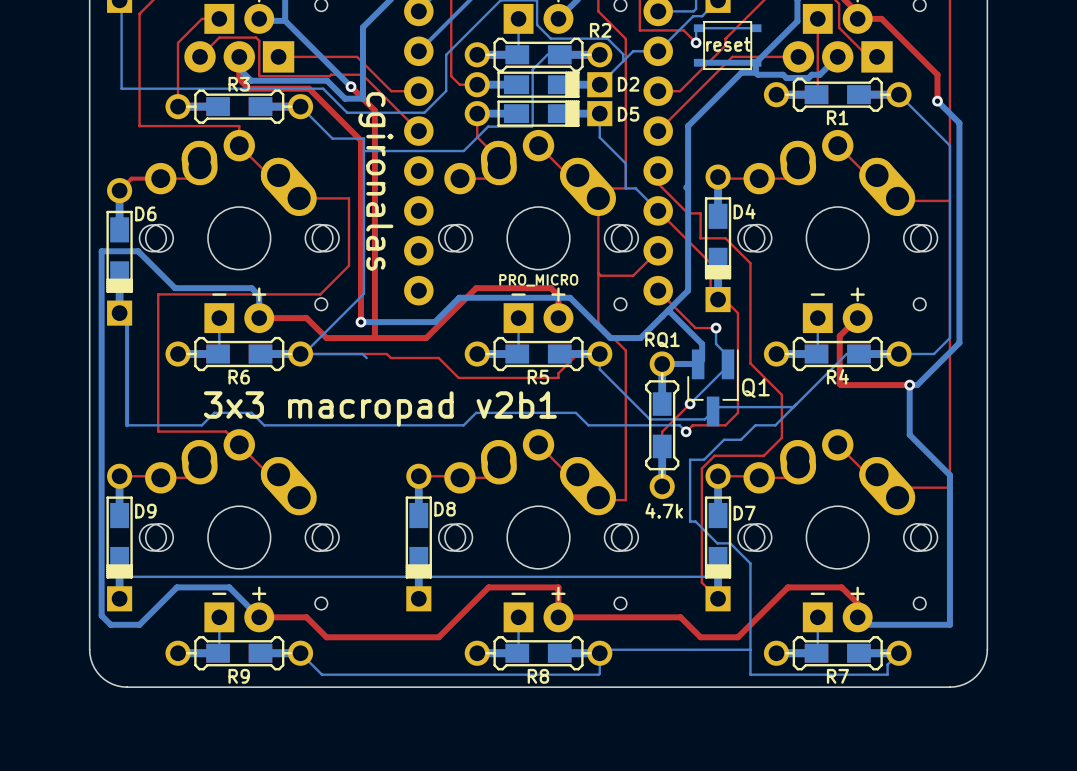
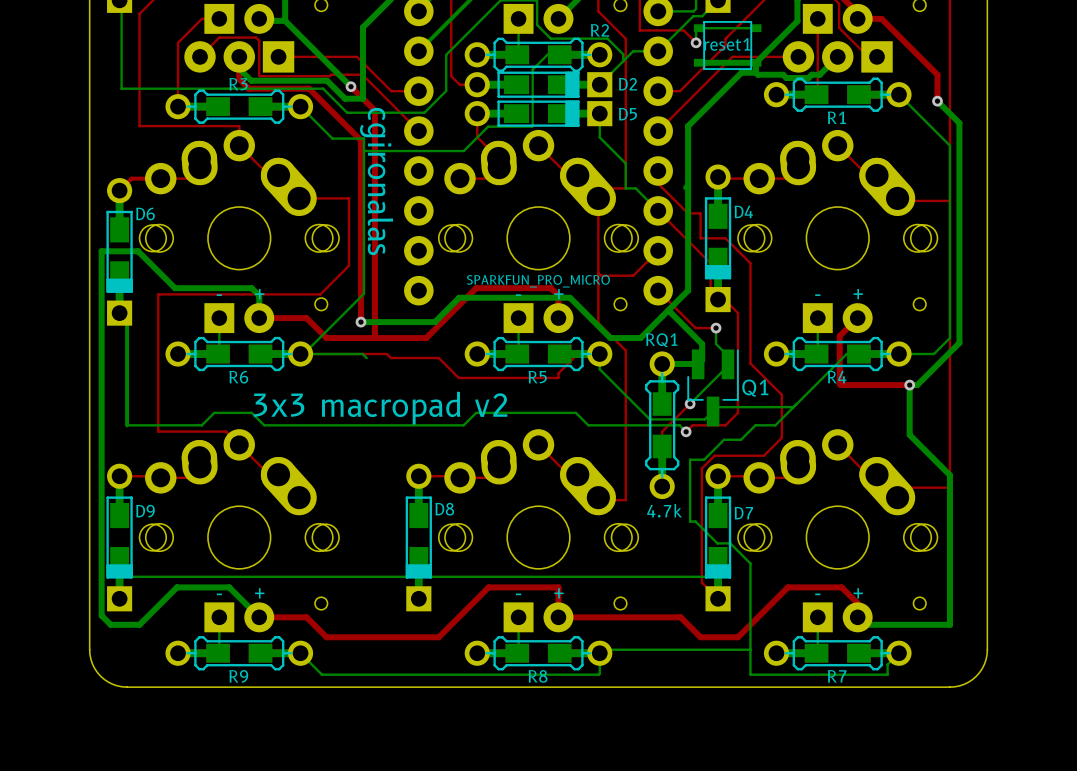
reset name: reset (728, 44) -> reset1 (727, 44)
part value: PRO_MICRO (538, 280) -> SPARKFUN_PRO_MICRO (538, 281)
text: 3x3 macropad v2b1 (380, 408) -> 3x3 macropad v2 (380, 408)

